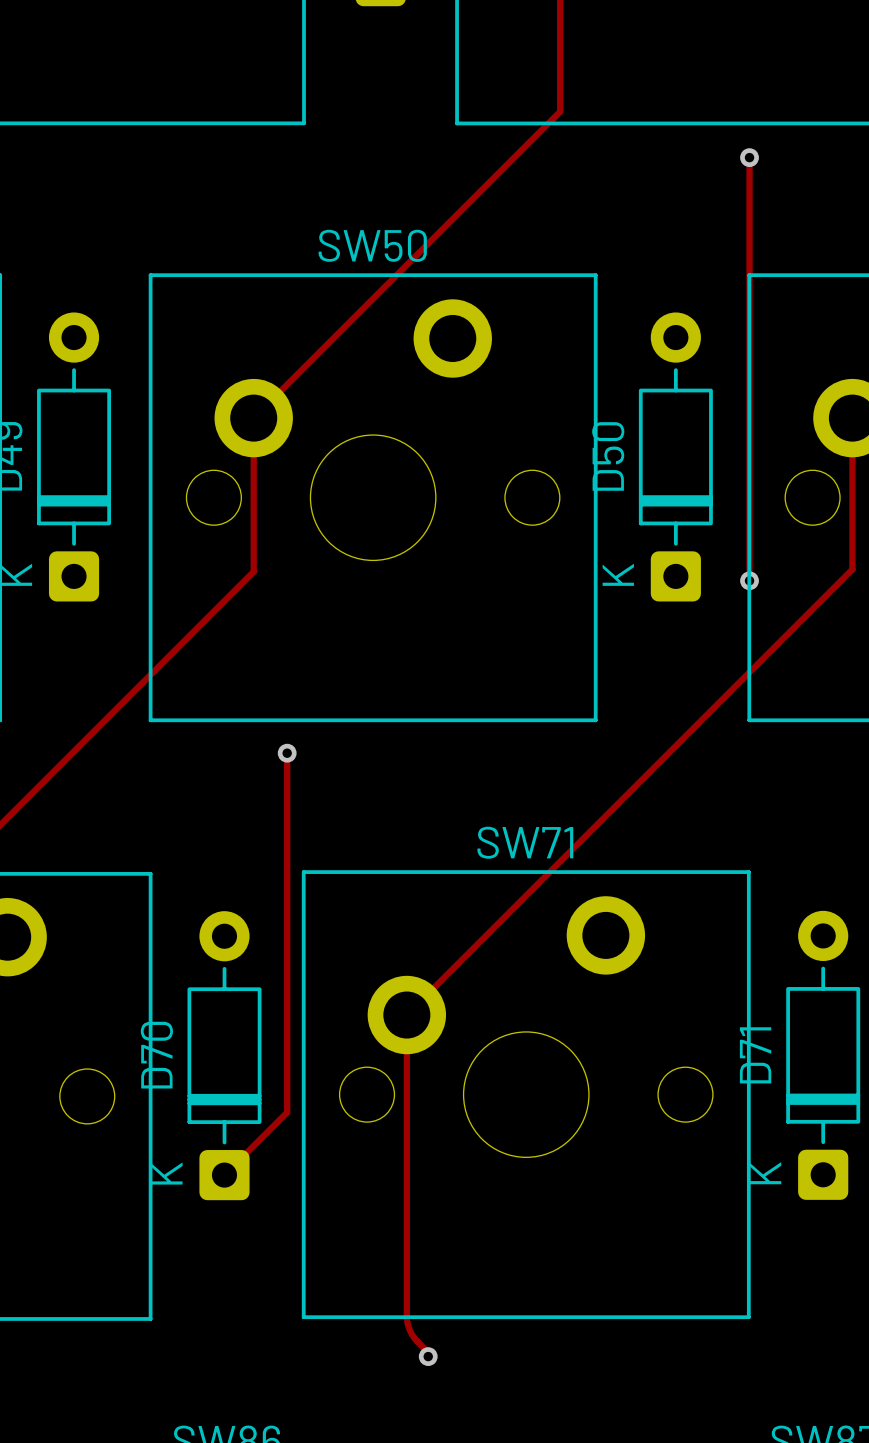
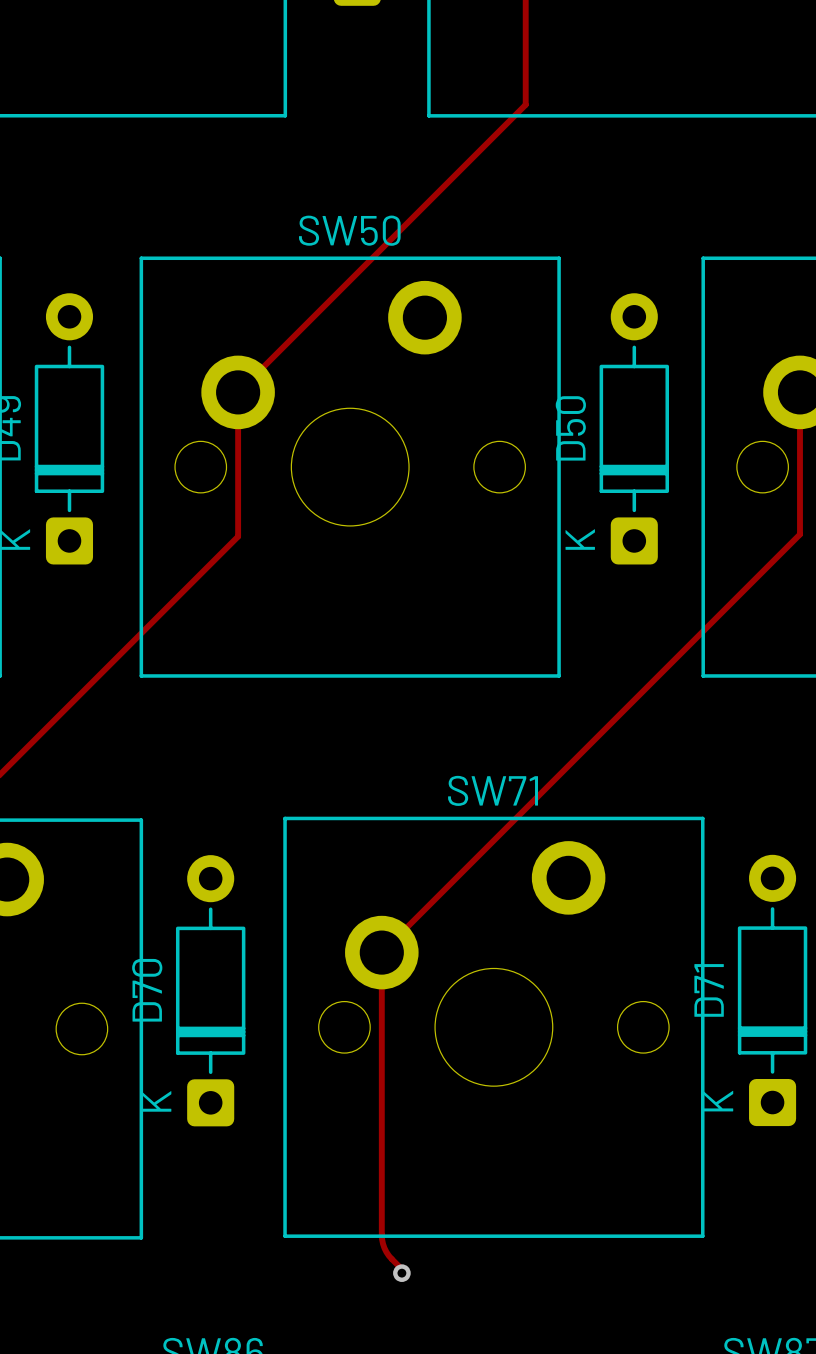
track: (749, 157) (749, 580) -> none
via: (749, 157) -> none
via: (749, 580) -> none
track: (287, 753) (287, 1112) (224, 1175) -> none
via: (287, 753) -> none

